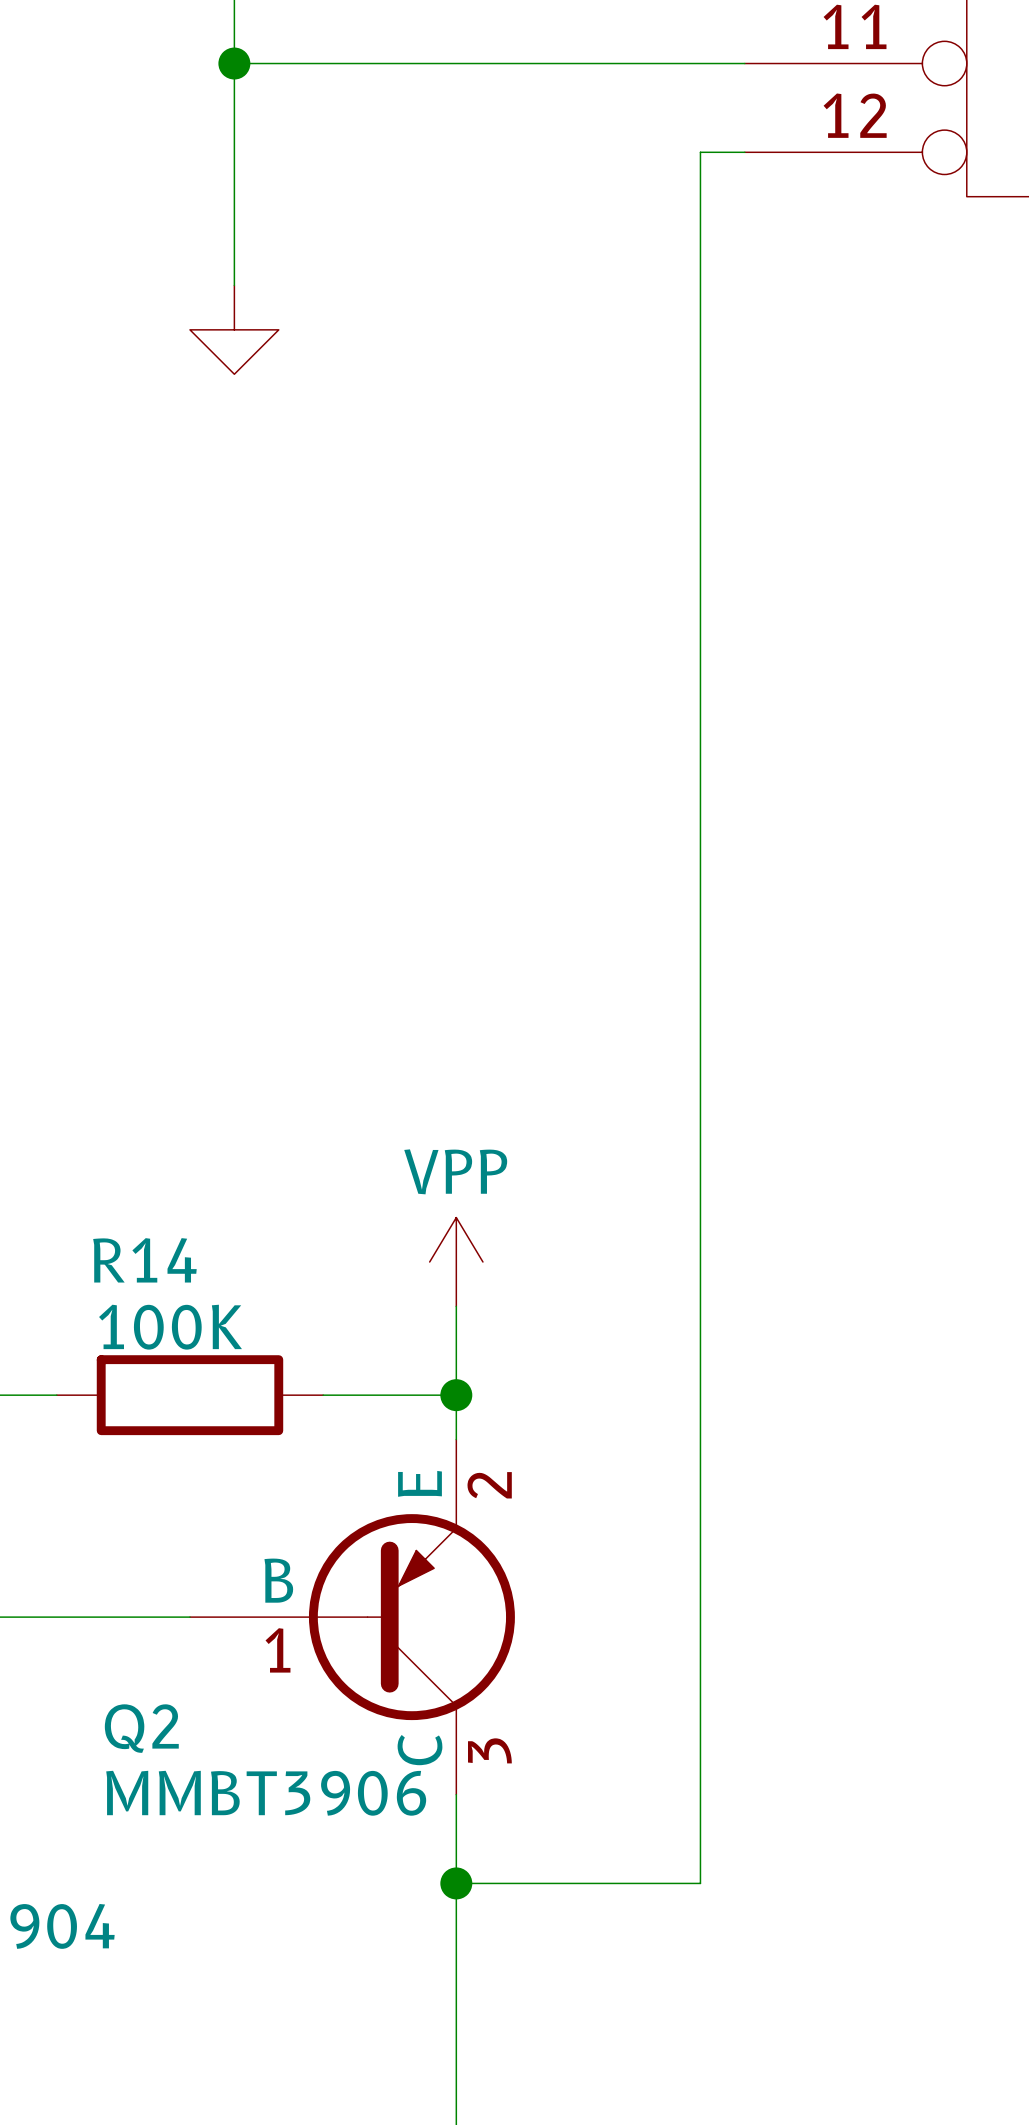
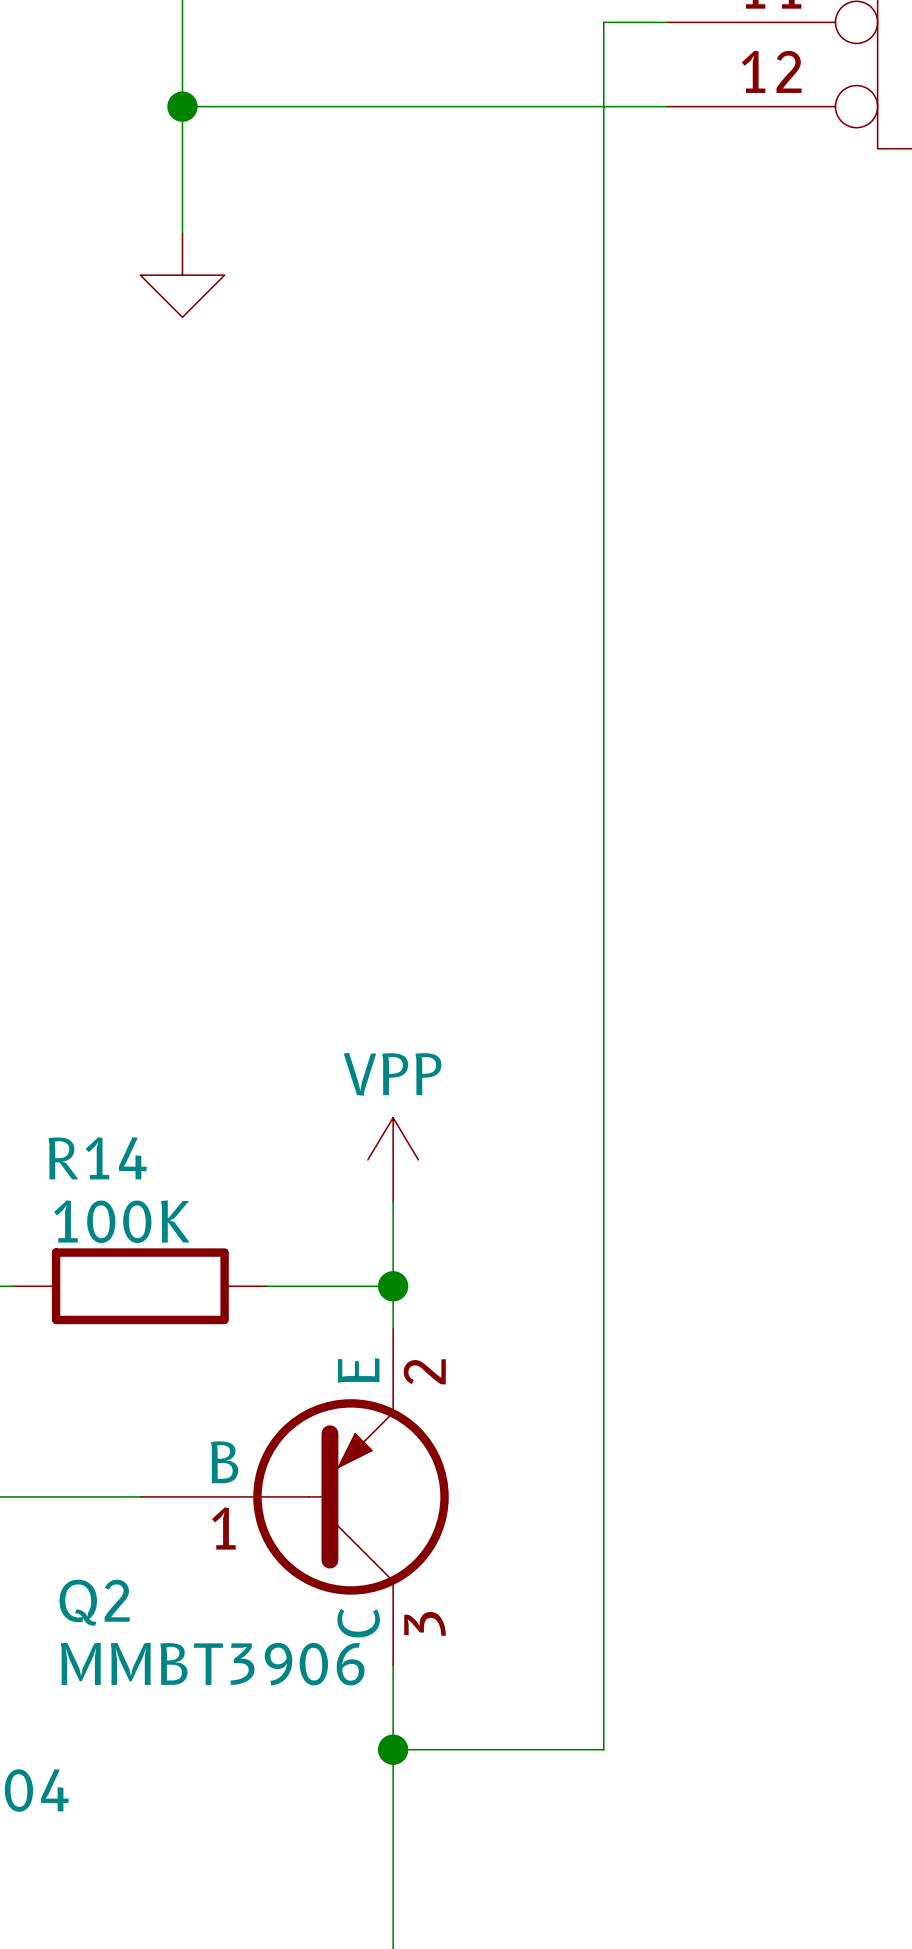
wire: (234, 63) (678, 63) -> none
junction position: (234, 63) -> (182, 106)
wire: none -> (182, 106) (624, 106)
wire: (700, 152) (700, 1883) (678, 1883) -> (603, 22) (603, 1749)

